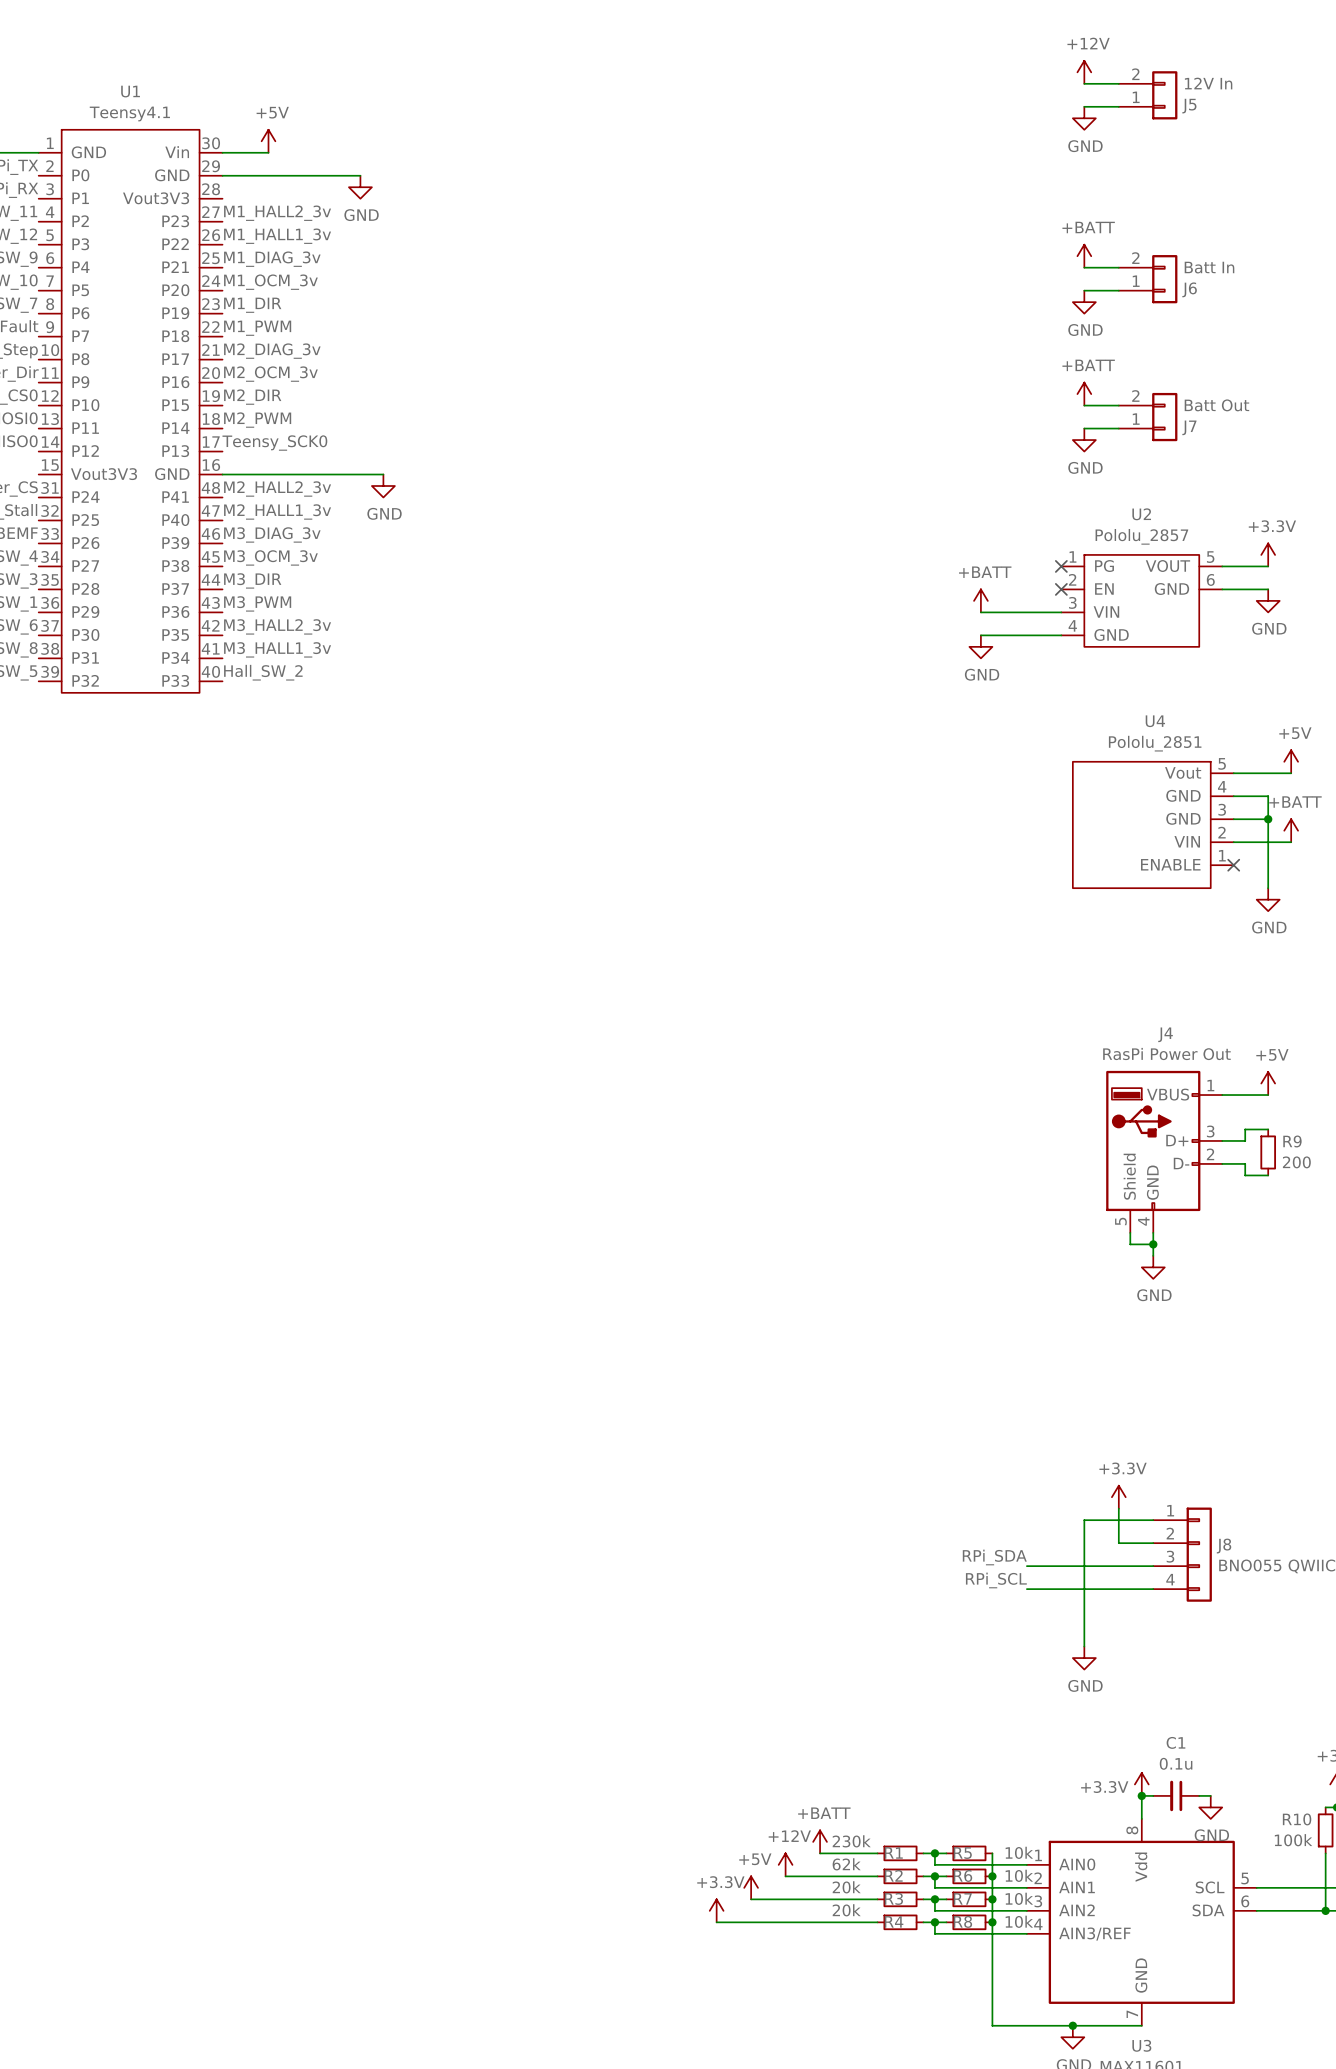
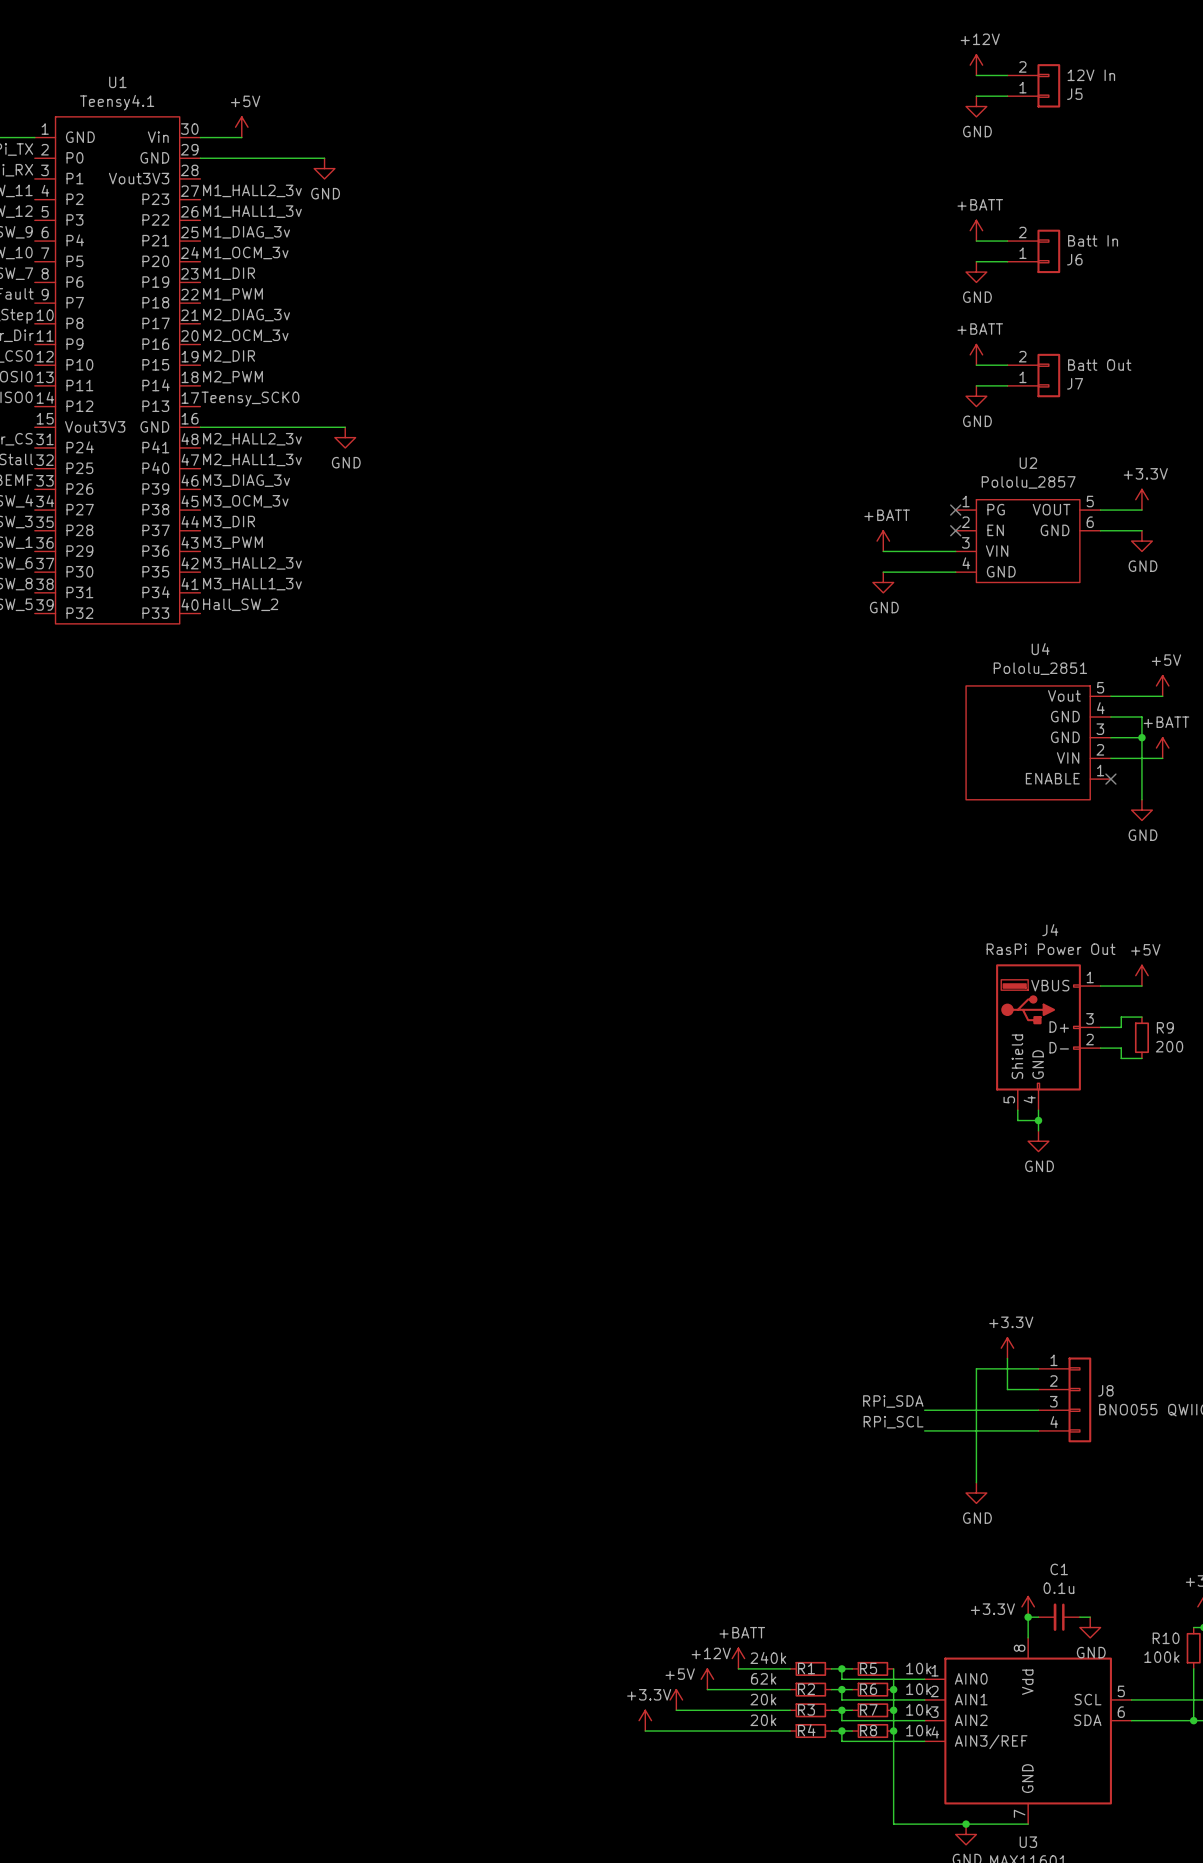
R1 value: 230k (851, 1841) -> 240k (768, 1657)

